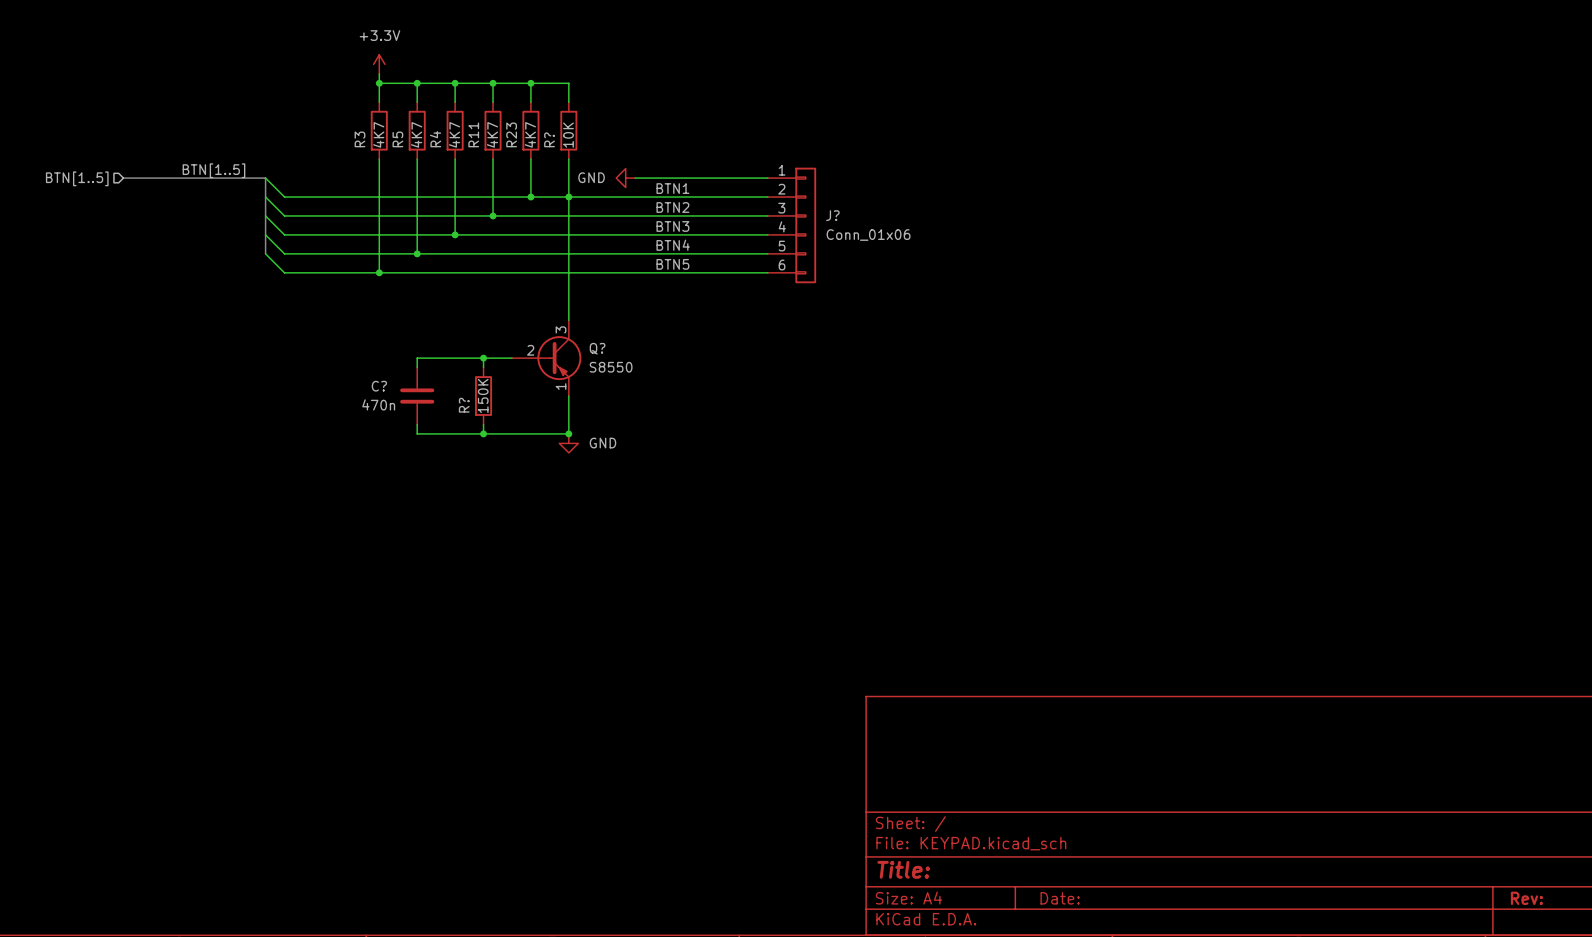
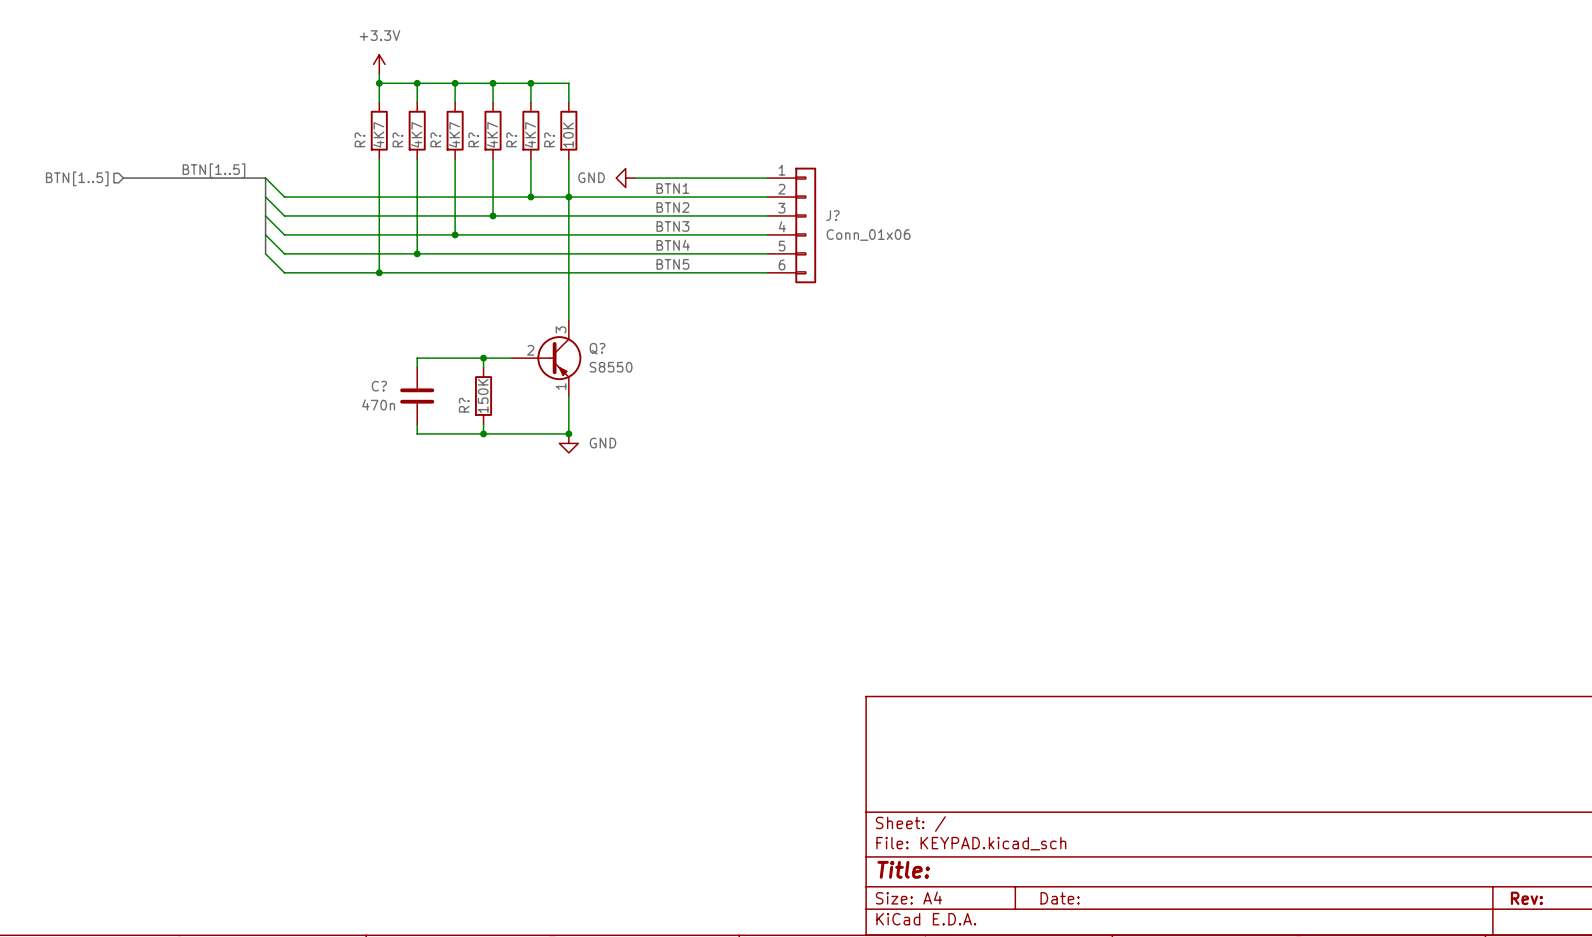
R11 name: R11 (473, 134) -> R? (473, 139)
R23 name: R23 (511, 134) -> R? (511, 139)
R3 name: R3 (359, 139) -> R? (359, 139)
R5 name: R5 (397, 139) -> R? (397, 139)
R4 name: R4 (435, 139) -> R? (435, 139)

